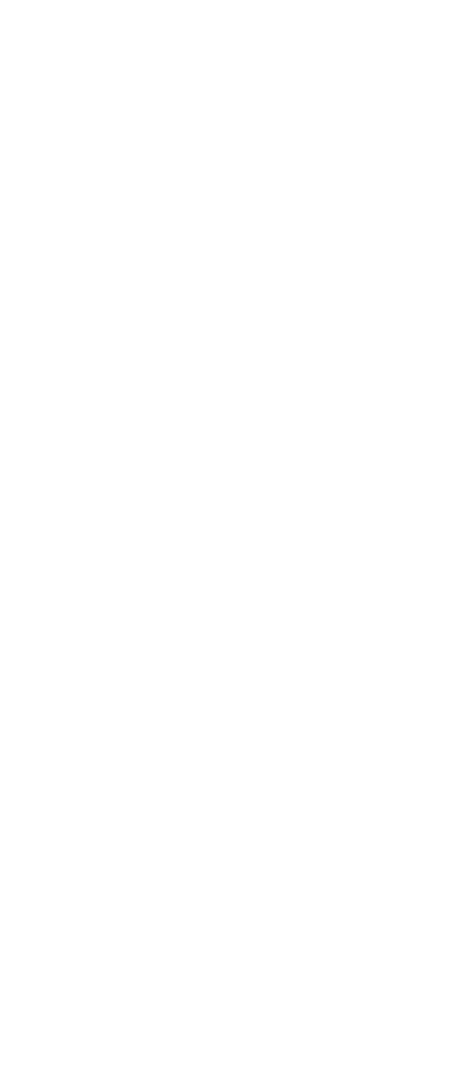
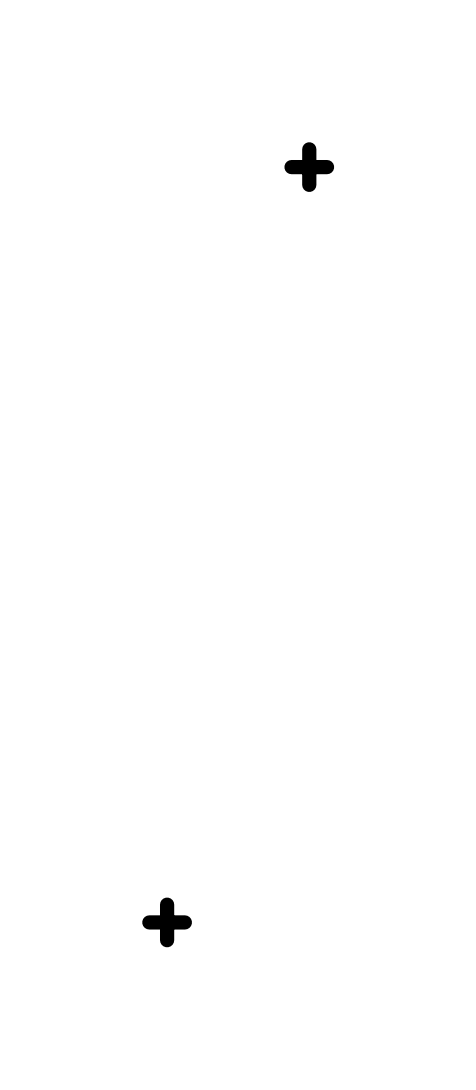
line: none -> (309, 149) (309, 184)
line: none -> (291, 167) (327, 167)
line: none -> (167, 904) (167, 940)
line: none -> (149, 922) (184, 922)

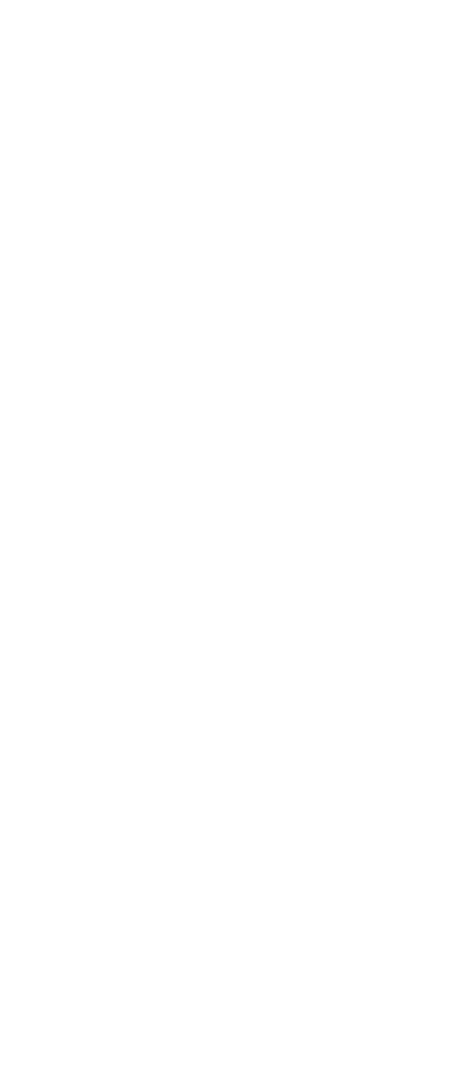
line: (309, 149) (309, 184) -> none
line: (291, 167) (327, 167) -> none
line: (167, 904) (167, 940) -> none
line: (149, 922) (184, 922) -> none

